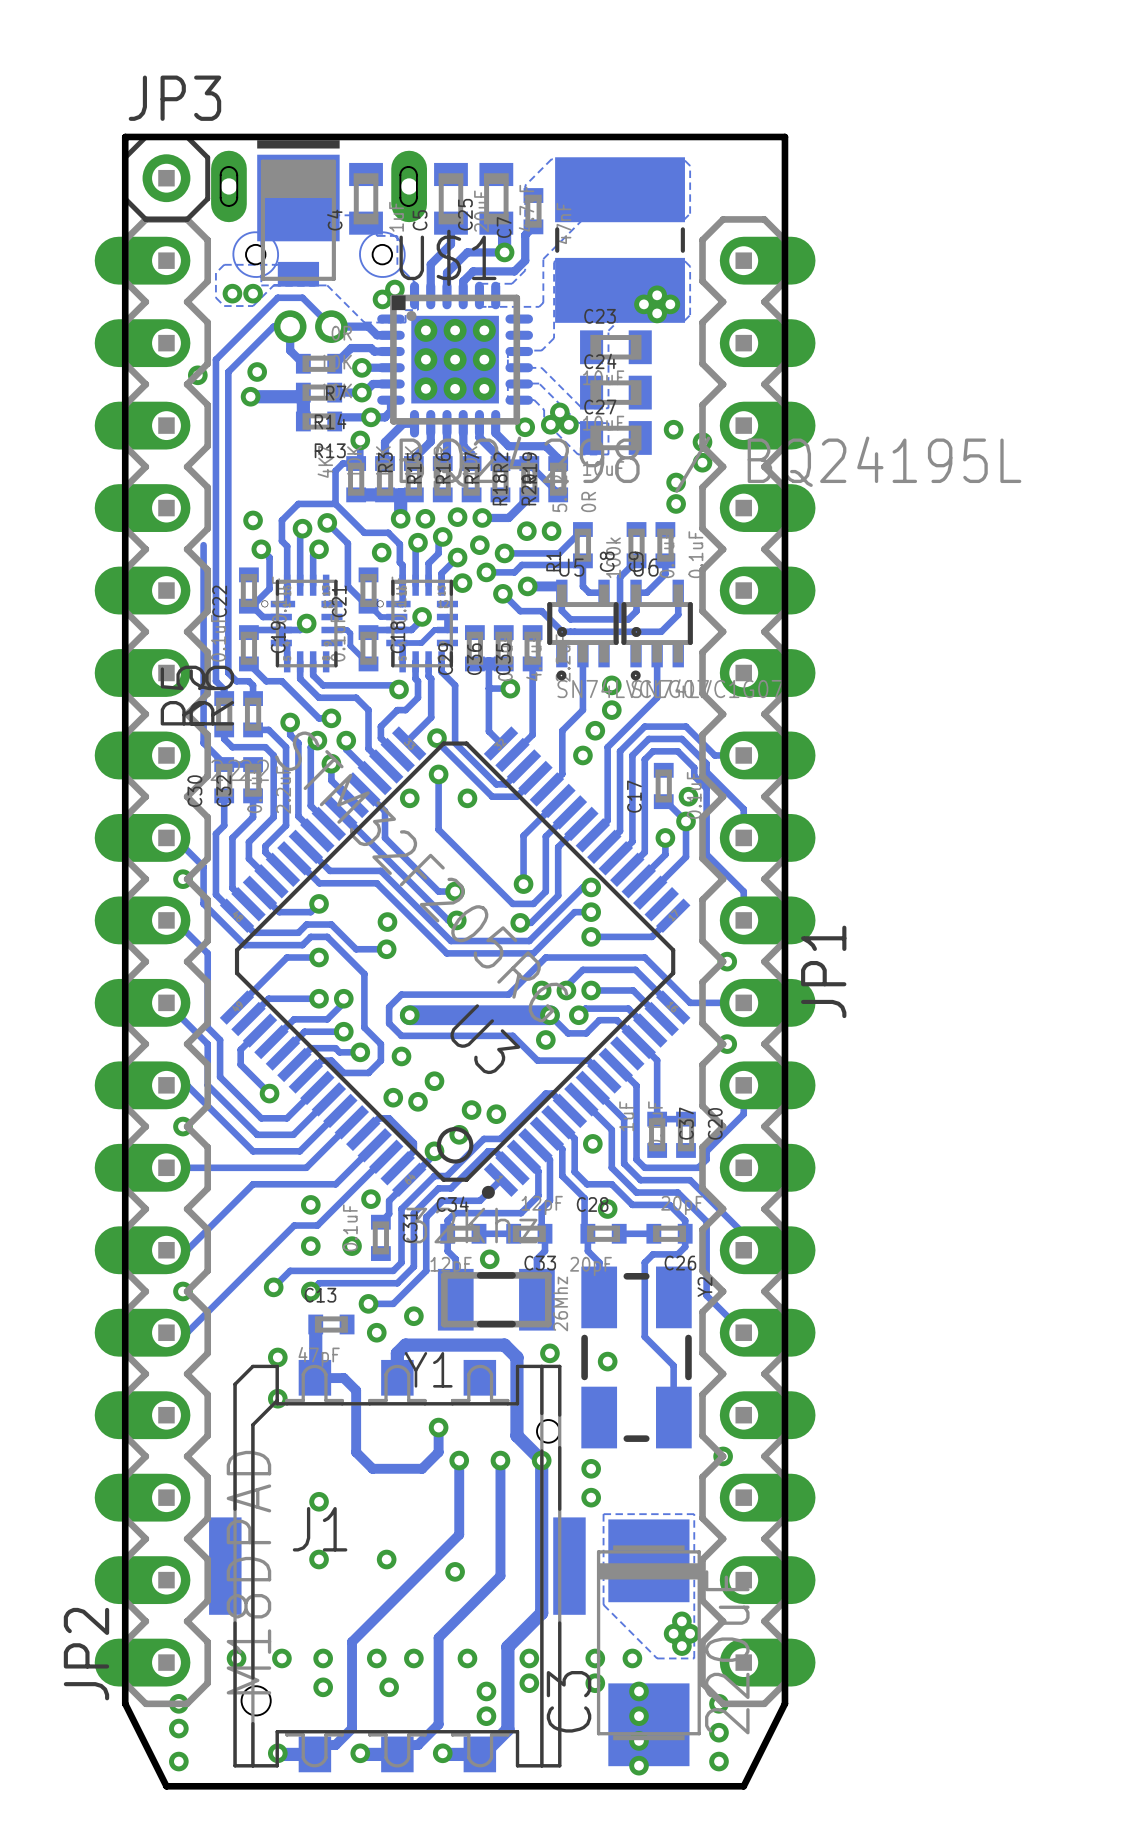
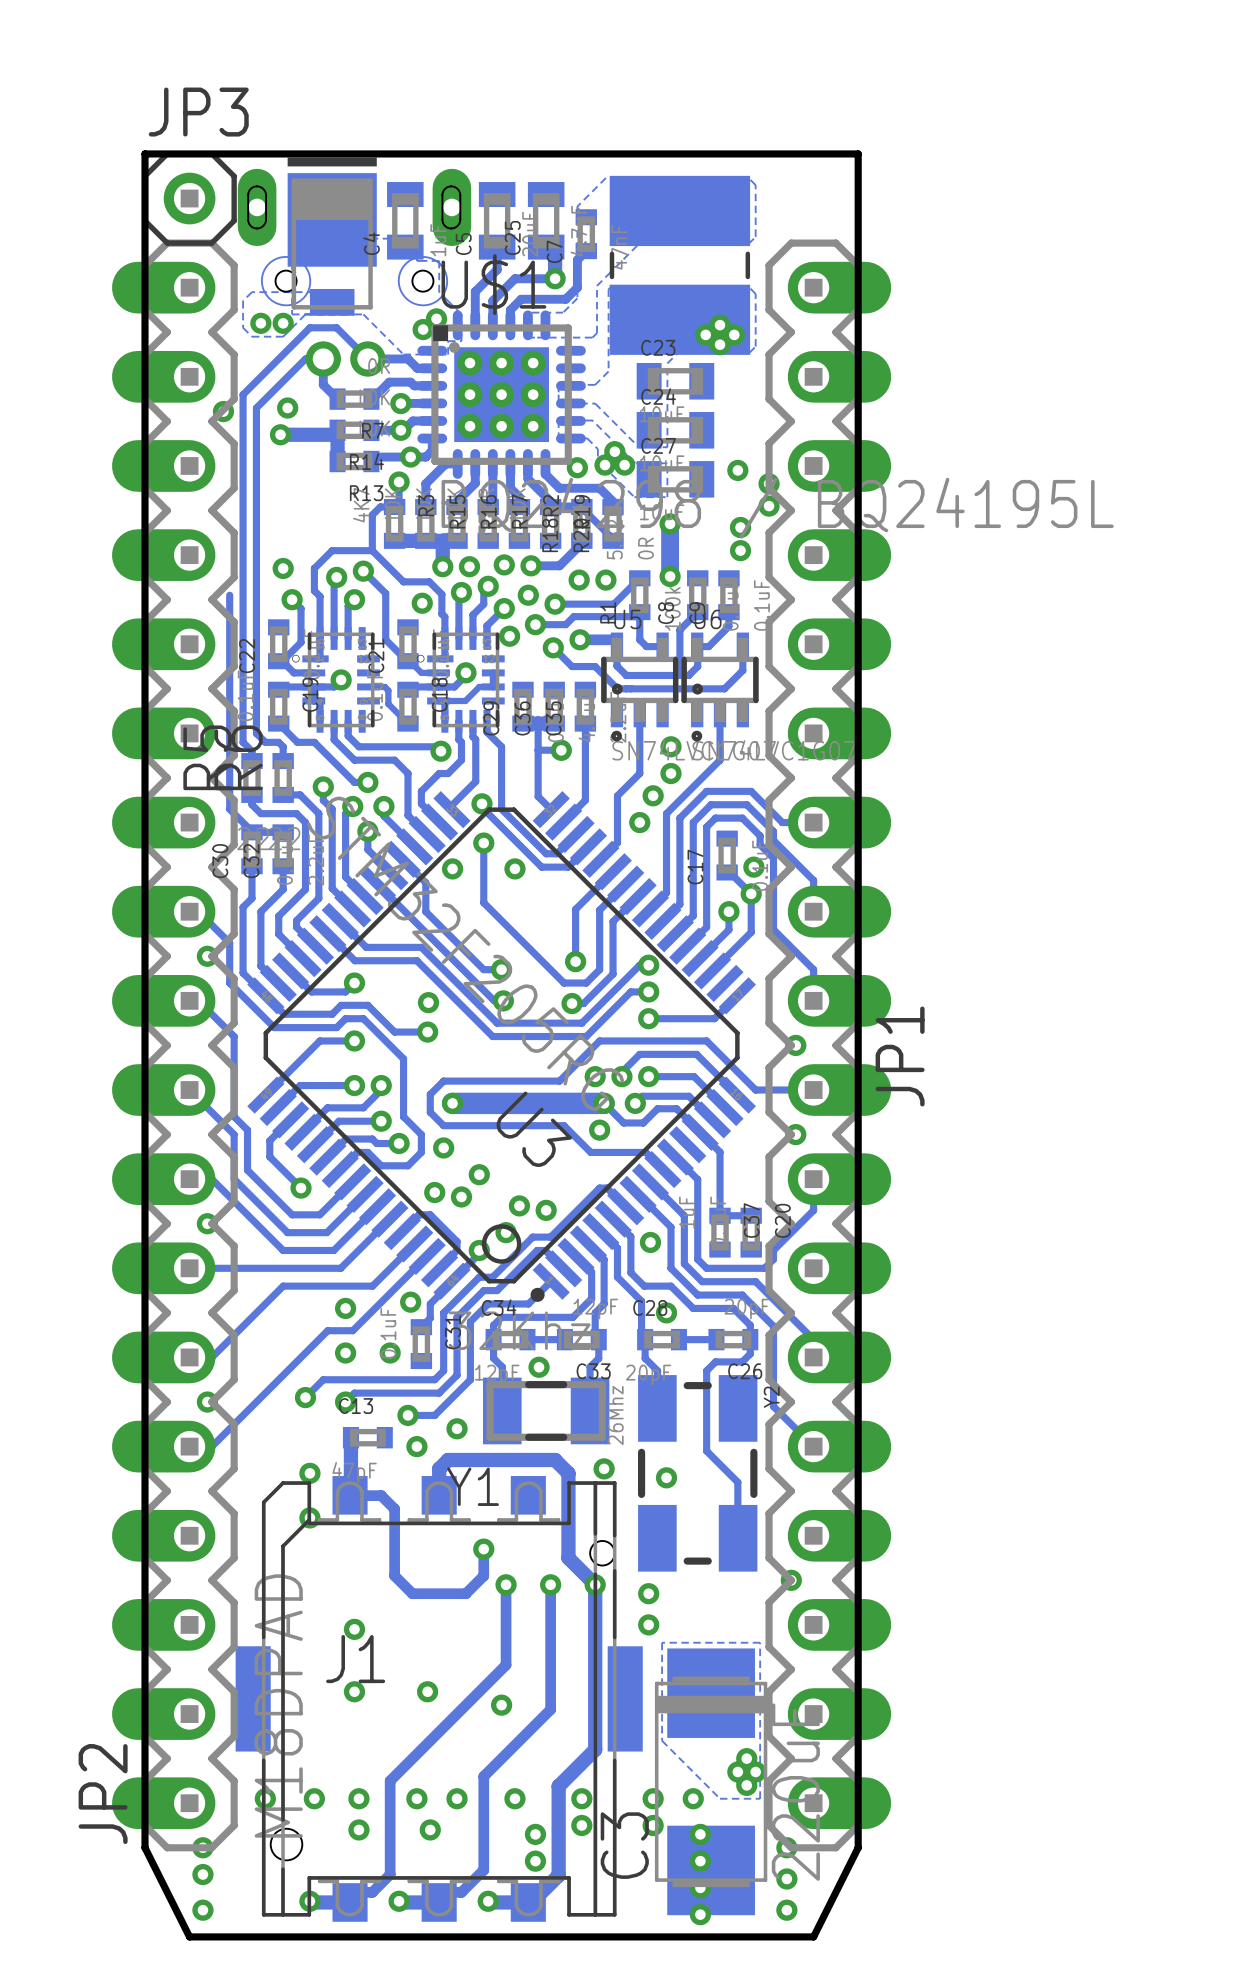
track: none -> (670, 523) (670, 576)
via: none -> (670, 523)
via: none -> (670, 576)

